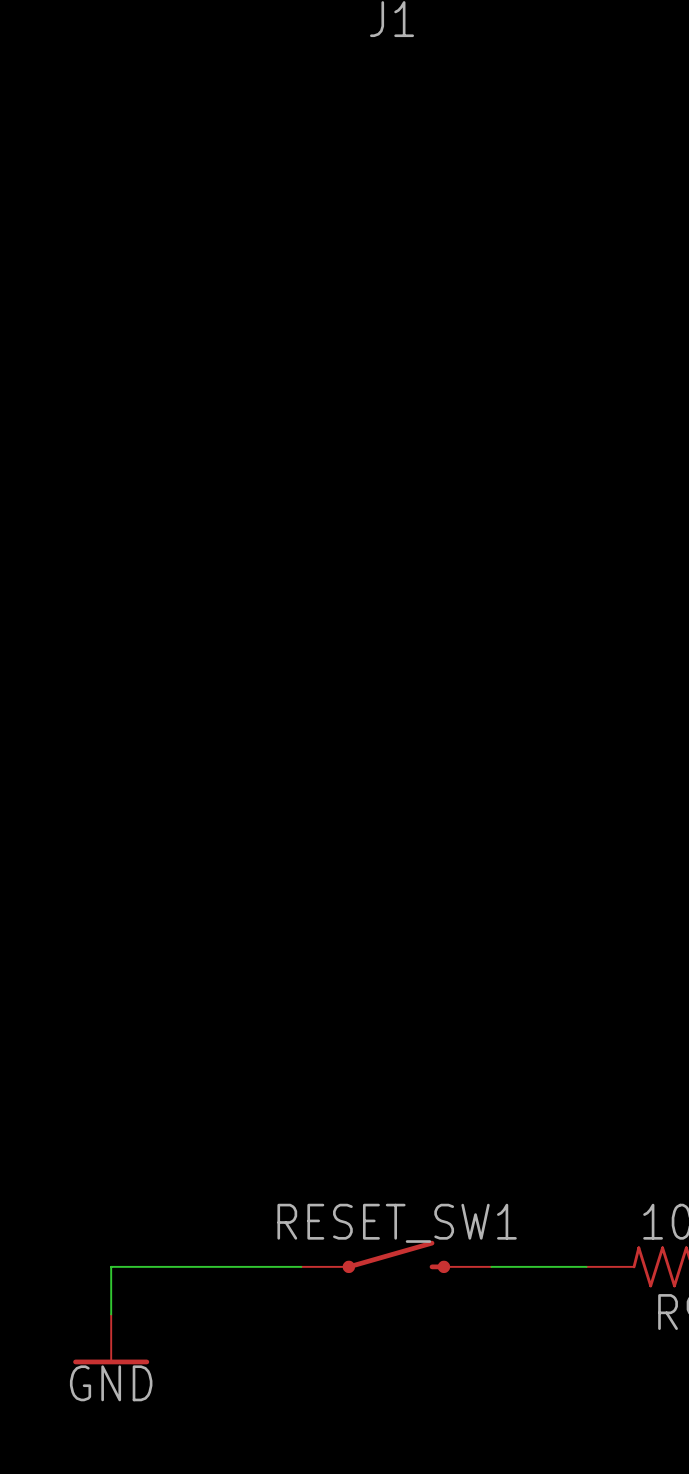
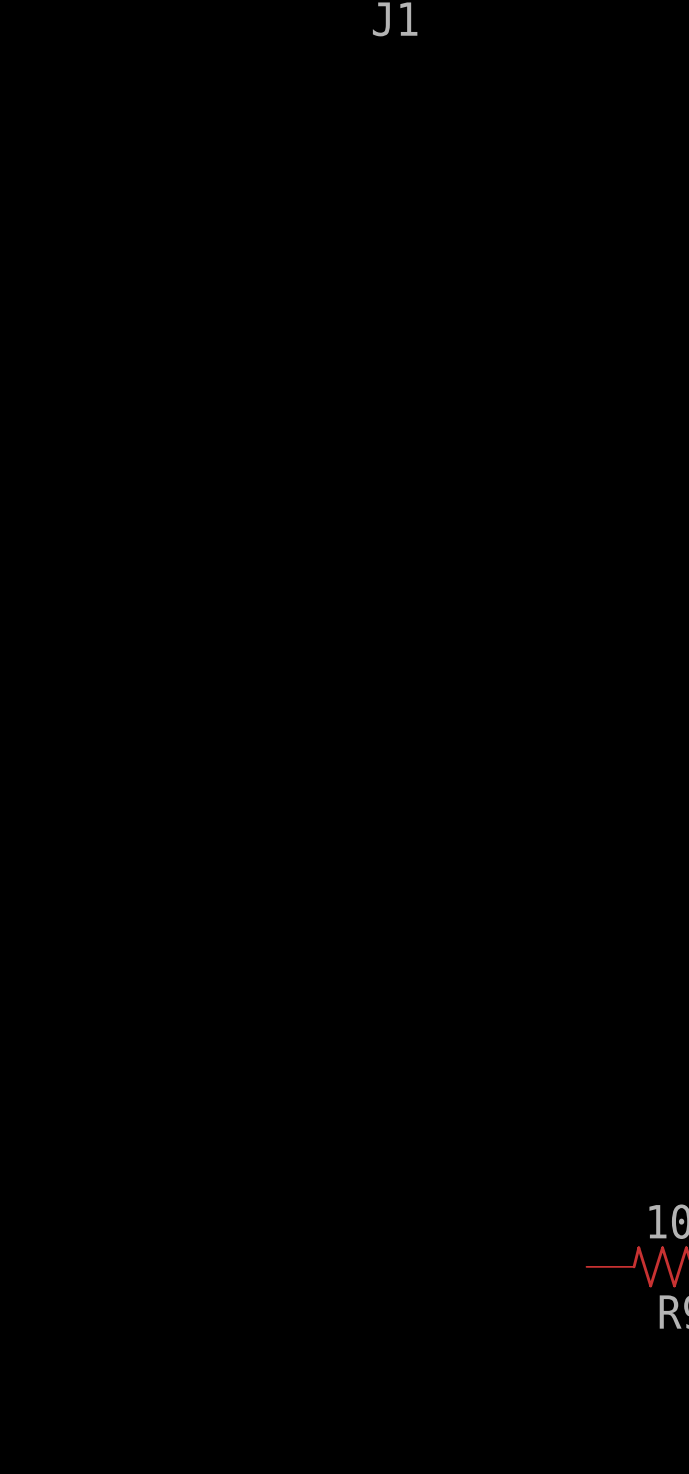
RESET_SW1: (396, 1256) -> none
wire: (301, 1266) (111, 1266) (111, 1314) -> none
wire: (491, 1266) (586, 1266) -> none
power symbol: GND (111, 1339) -> none

